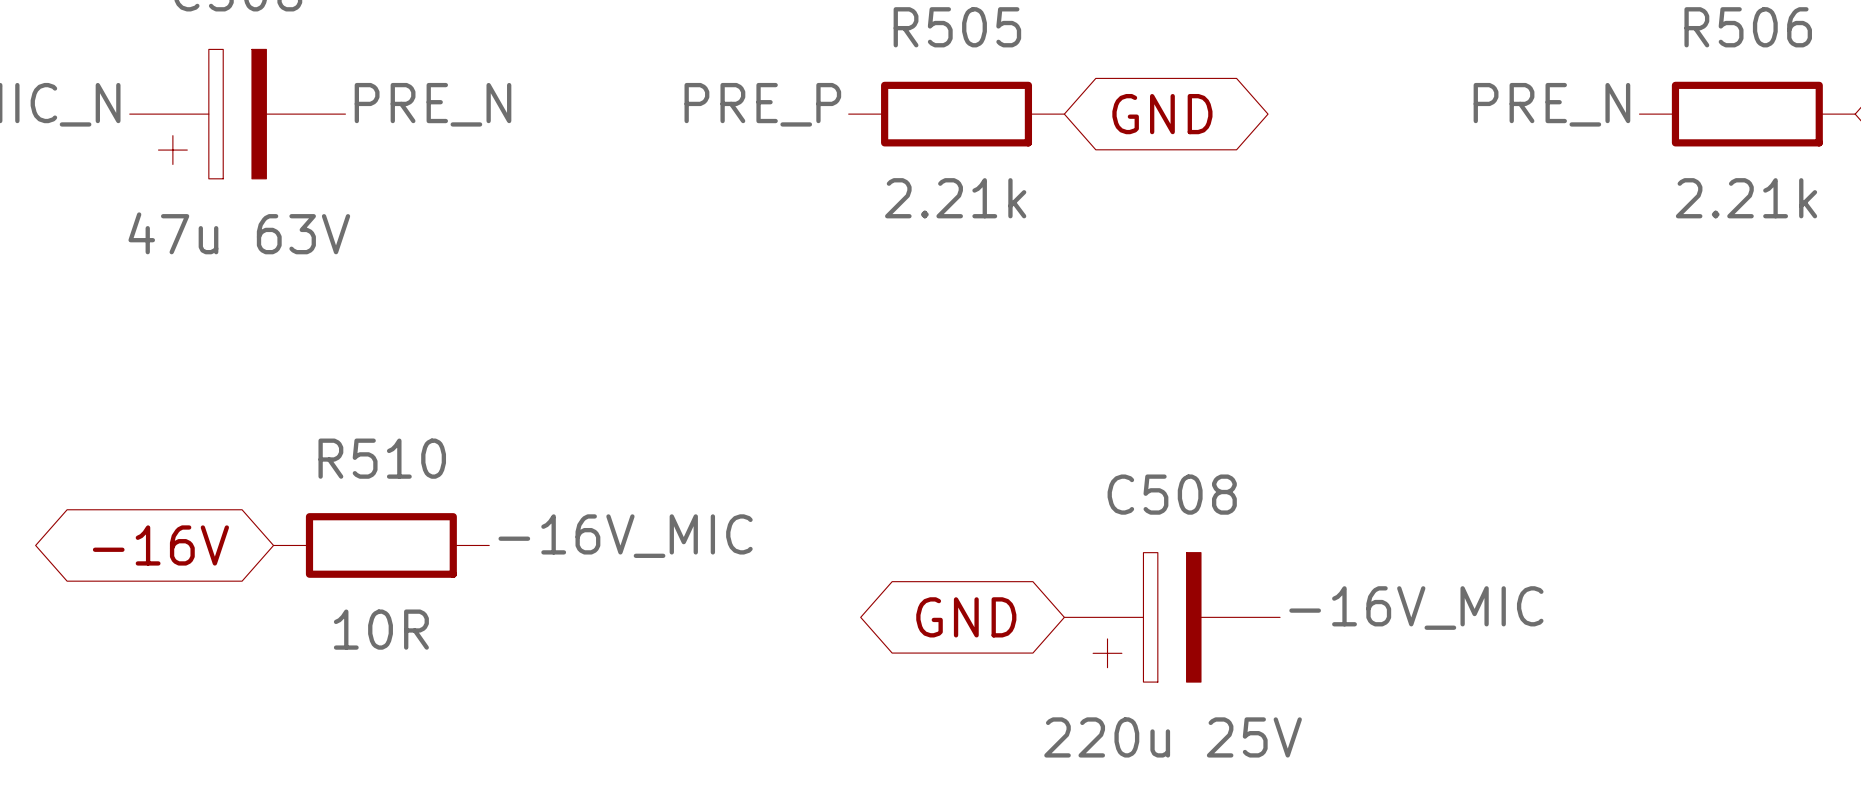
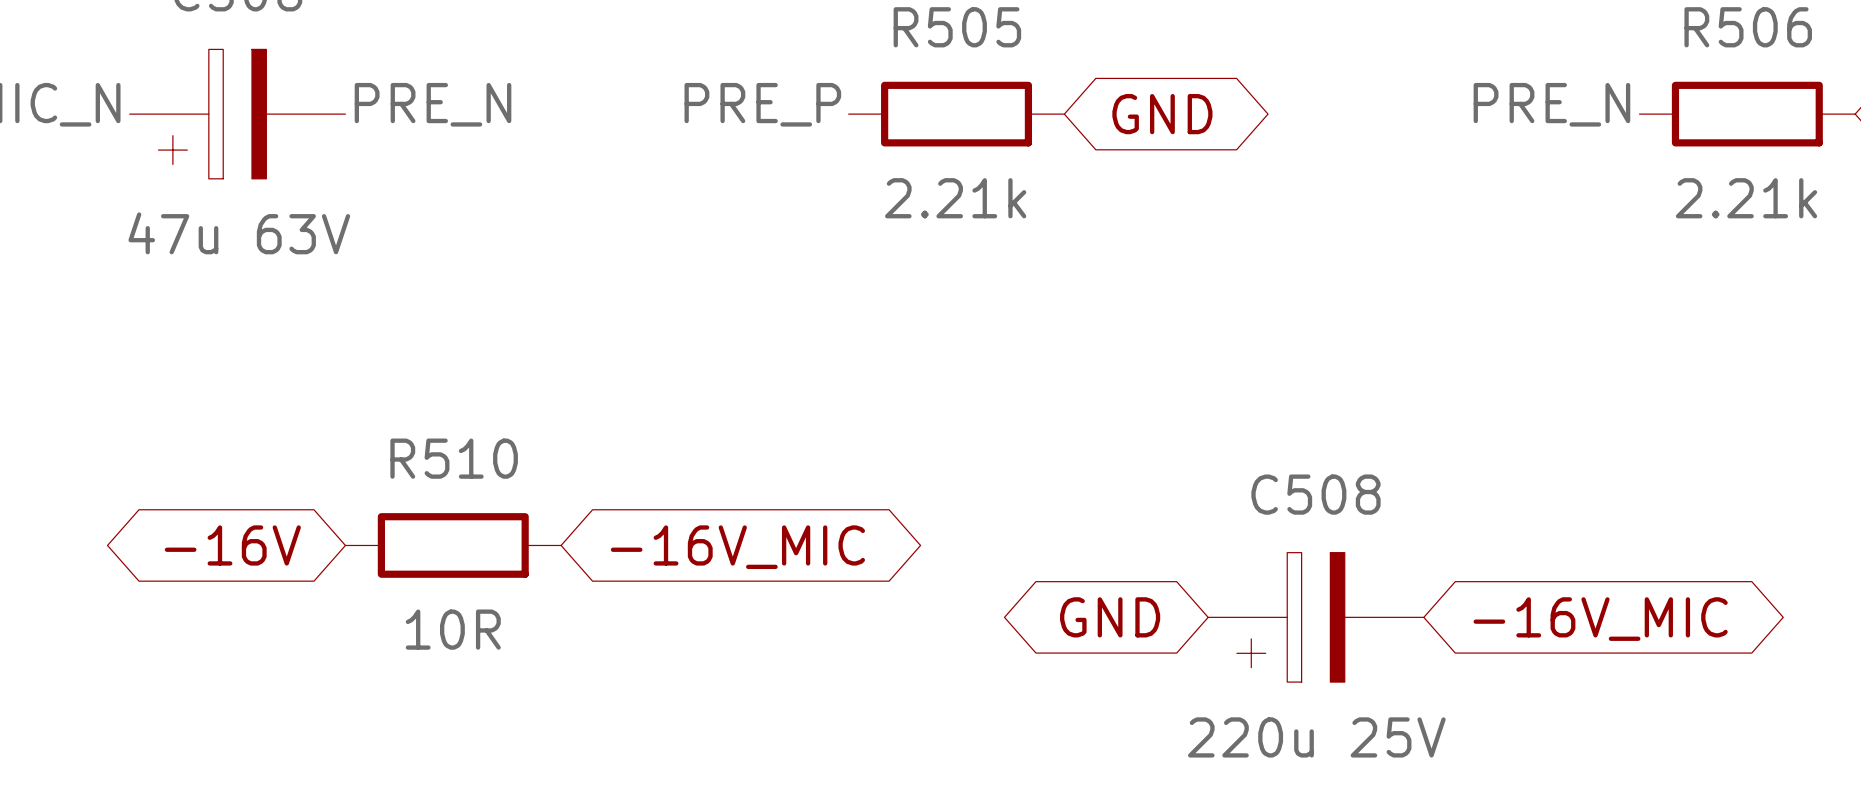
label: -16V_MIC (625, 536) -> none
global label position: -16V (160, 545) -> -16V (232, 545)
R510 position: (381, 545) -> (453, 545)
global label: none -> -16V_MIC (737, 547)
label: -16V_MIC (1416, 608) -> none
global label position: GND (966, 617) -> GND (1110, 617)
C508 position: (1172, 617) -> (1315, 617)
global label: none -> -16V_MIC (1600, 619)

